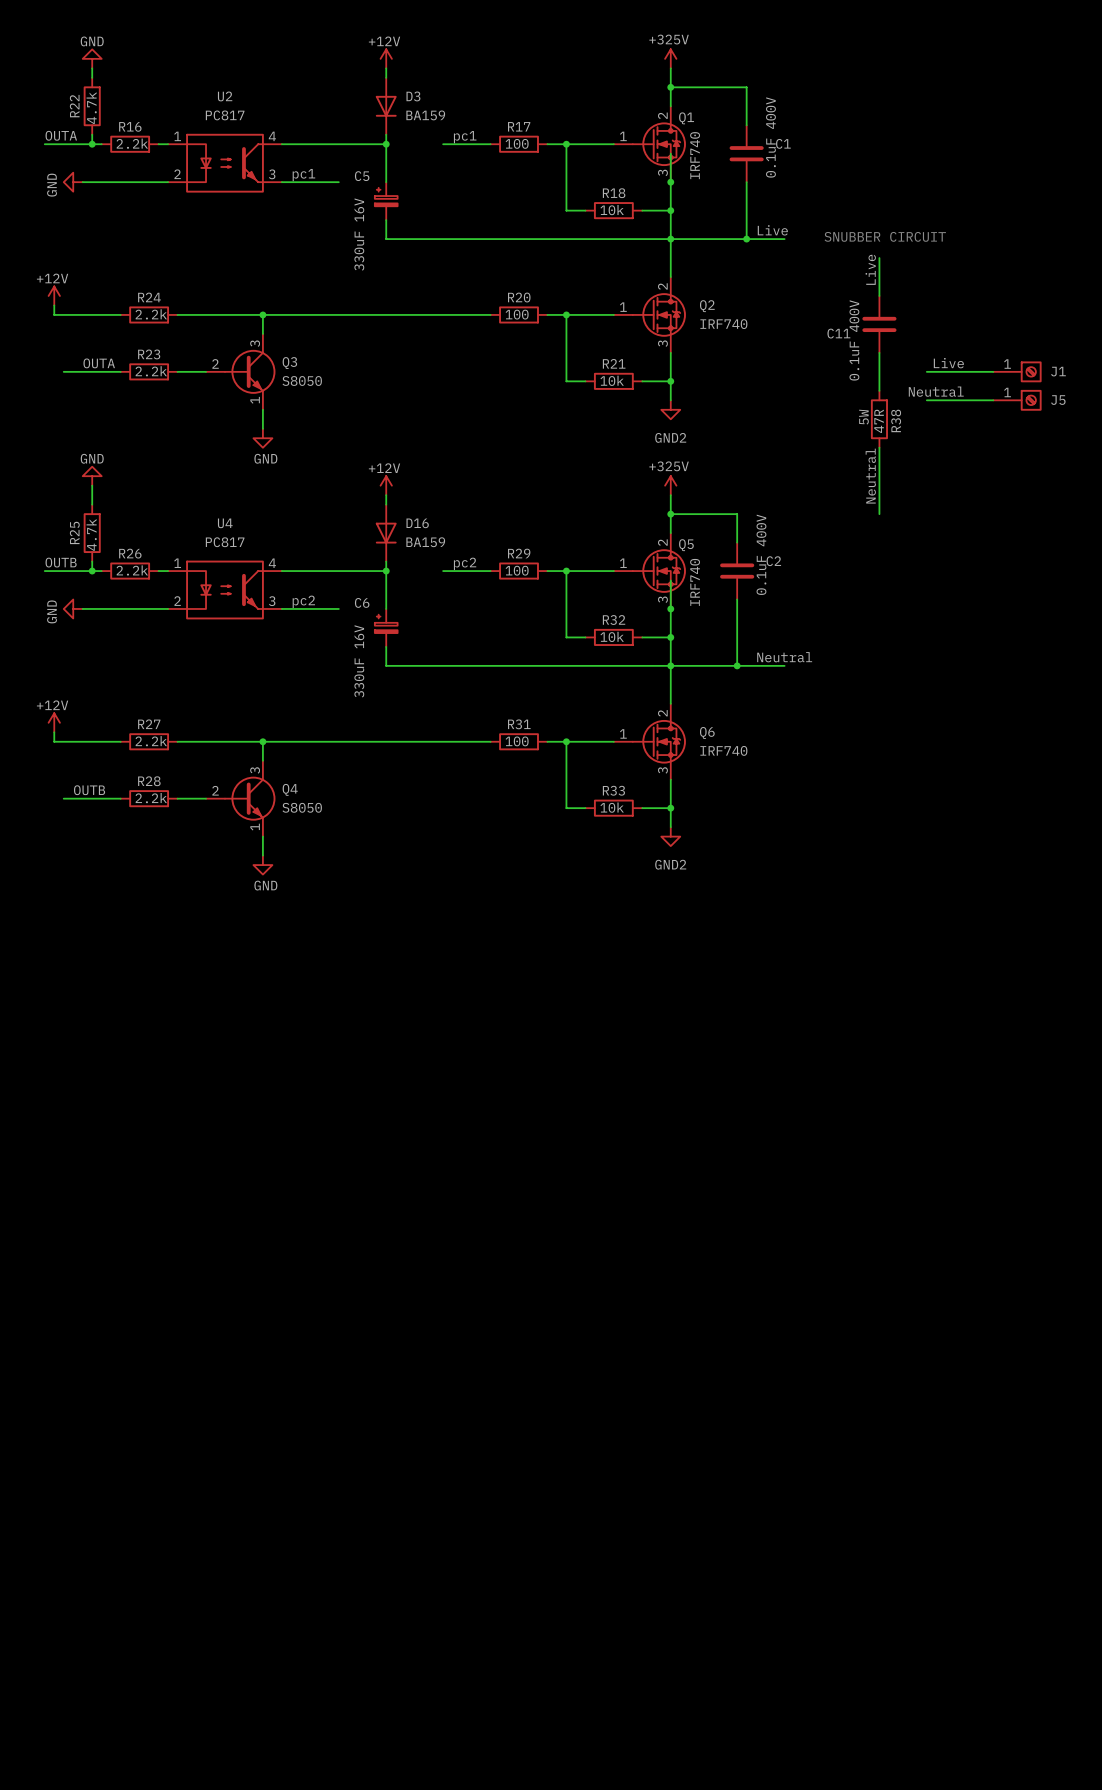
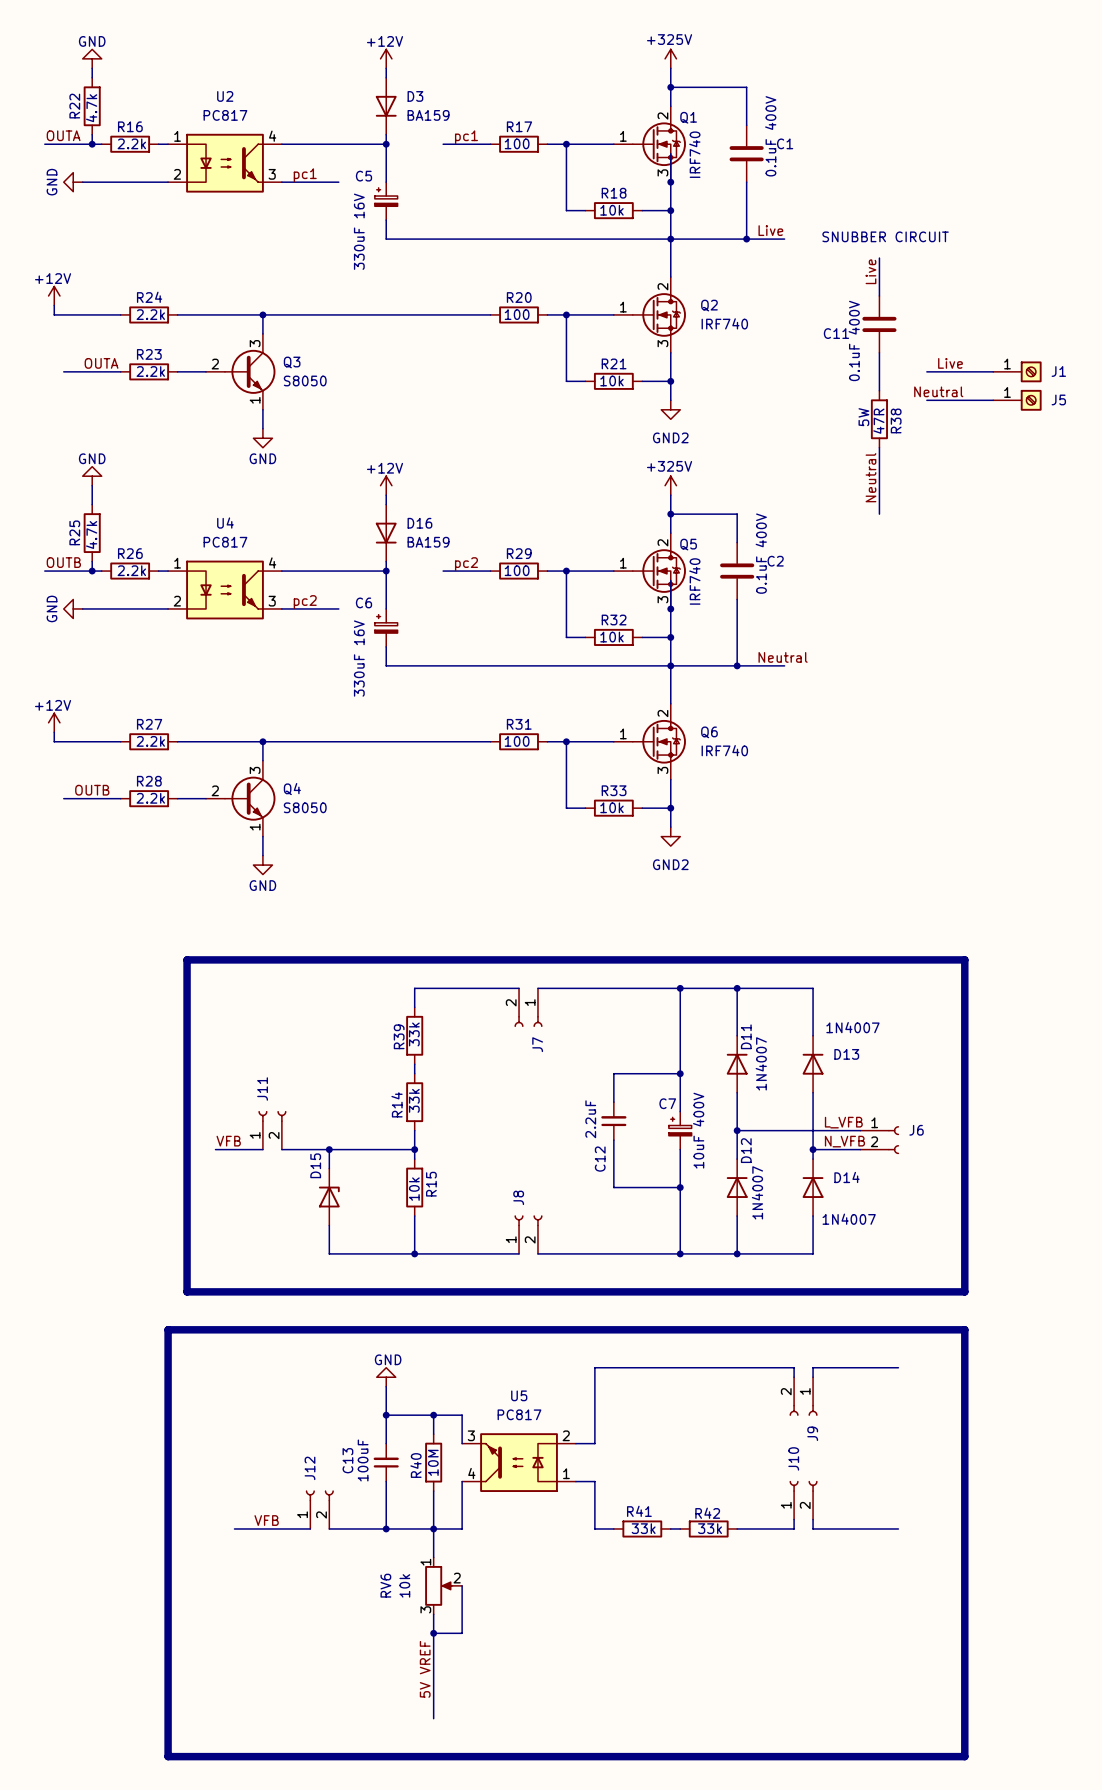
line: none -> (187, 959) (964, 959) (964, 1291) (187, 1291) (187, 959)
wire: none -> (519, 988) (414, 988) (414, 1007)
wire: none -> (537, 988) (813, 988) (813, 1035)
wire: none -> (680, 988) (680, 1111)
junction: none -> (680, 988)
wire: none -> (737, 988) (737, 1035)
junction: none -> (737, 988)
J7: none -> (528, 1007)
R39: none -> 33k (414, 1035)
wire: none -> (414, 1064) (414, 1073)
D11: none -> 1N4007 (737, 1064)
D13: none -> 1N4007 (813, 1064)
wire: none -> (680, 1073) (613, 1073) (613, 1102)
junction: none -> (680, 1073)
wire: none -> (737, 1092) (737, 1159)
wire: none -> (813, 1092) (813, 1159)
R14: none -> 33k (414, 1102)
C12: none -> 2.2uF (613, 1121)
label: none -> L_VFB (843, 1122)
J11: none -> (272, 1130)
wire: none -> (414, 1130) (414, 1159)
C7: none -> 10uF 400V (680, 1130)
wire: none -> (737, 1130) (860, 1130)
junction: none -> (737, 1130)
wire: none -> (613, 1140) (613, 1187) (680, 1187)
J6: none -> (879, 1140)
label: none -> VFB (228, 1141)
label: none -> N_VFB (844, 1141)
wire: none -> (215, 1149) (262, 1149)
wire: none -> (281, 1149) (414, 1149)
wire: none -> (329, 1149) (329, 1168)
junction: none -> (329, 1149)
junction: none -> (414, 1149)
wire: none -> (680, 1149) (680, 1253)
wire: none -> (813, 1149) (860, 1149)
junction: none -> (813, 1149)
R15: none -> 10k (414, 1187)
junction: none -> (680, 1187)
D12: none -> 1N4007 (737, 1187)
D14: none -> 1N4007 (813, 1187)
D15: none -> (329, 1197)
wire: none -> (414, 1215) (414, 1253)
wire: none -> (737, 1215) (737, 1253)
wire: none -> (813, 1215) (813, 1253) (537, 1253)
wire: none -> (329, 1225) (329, 1253) (519, 1253)
J8: none -> (528, 1234)
junction: none -> (414, 1253)
junction: none -> (680, 1253)
junction: none -> (737, 1253)
line: none -> (168, 1329) (964, 1329) (964, 1756) (168, 1756) (168, 1329)
wire: none -> (898, 1367) (813, 1367) (813, 1377)
power symbol: none -> GND (386, 1377)
wire: none -> (794, 1377) (794, 1367) (594, 1367) (594, 1443) (575, 1443)
wire: none -> (386, 1386) (386, 1443)
J9: none -> (803, 1396)
wire: none -> (386, 1415) (462, 1415) (462, 1443)
junction: none -> (386, 1415)
wire: none -> (433, 1415) (433, 1434)
junction: none -> (433, 1415)
C13: none -> 100uF (386, 1462)
R40: none -> 10M (433, 1462)
U5: none -> PC817 (519, 1462)
wire: none -> (386, 1481) (386, 1528)
wire: none -> (462, 1481) (462, 1528) (329, 1528)
wire: none -> (575, 1481) (594, 1481) (594, 1528) (613, 1528)
wire: none -> (433, 1491) (433, 1557)
J10: none -> (803, 1500)
J12: none -> (319, 1509)
wire: none -> (794, 1519) (794, 1528) (737, 1528)
wire: none -> (813, 1519) (813, 1528) (898, 1528)
label: none -> VFB (266, 1520)
wire: none -> (234, 1528) (310, 1528)
junction: none -> (386, 1528)
junction: none -> (433, 1528)
R41: none -> 33k (642, 1528)
wire: none -> (670, 1528) (680, 1528)
R42: none -> 33k (708, 1528)
RV6: none -> 10k (443, 1585)
wire: none -> (462, 1585) (462, 1633) (433, 1633)
wire: none -> (433, 1614) (433, 1718)
junction: none -> (433, 1633)
label: none -> 5V VREF (425, 1669)

